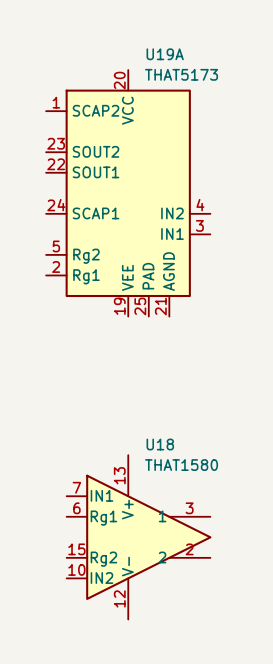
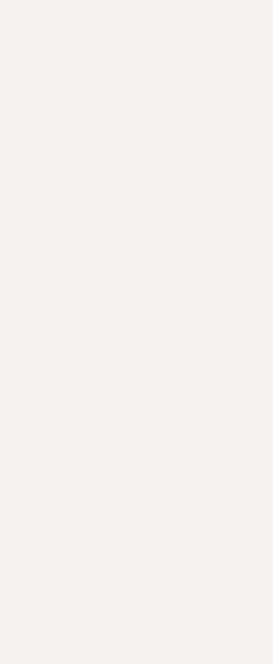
U19A: THAT5173 (128, 193) -> none
U18: THAT1580 (139, 537) -> none

